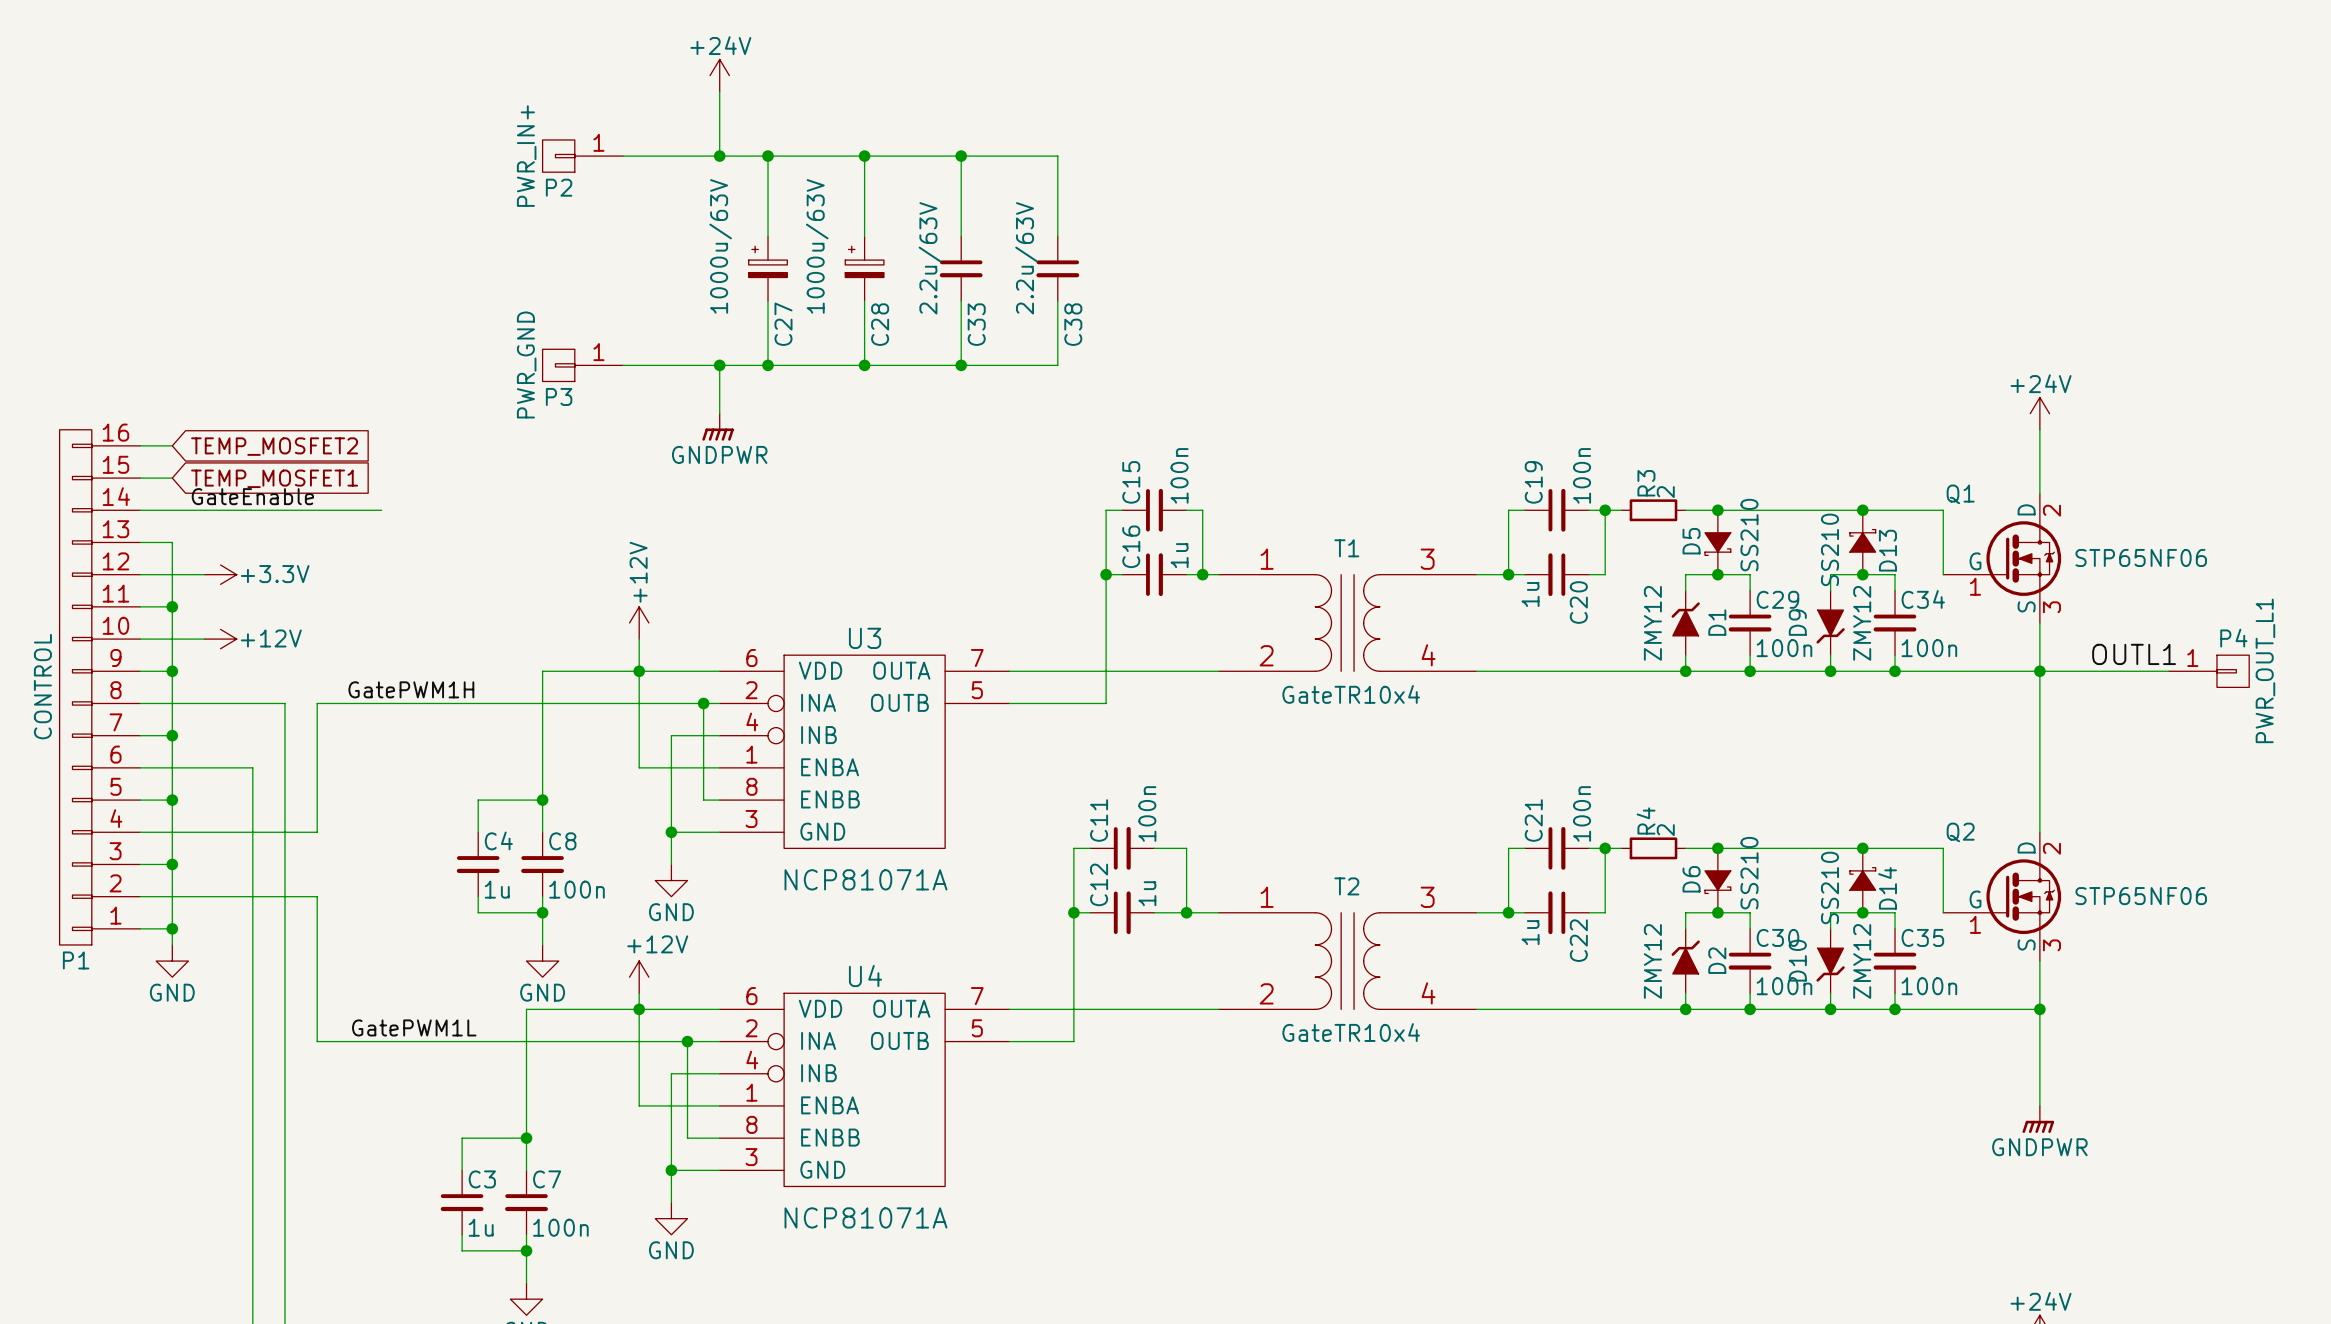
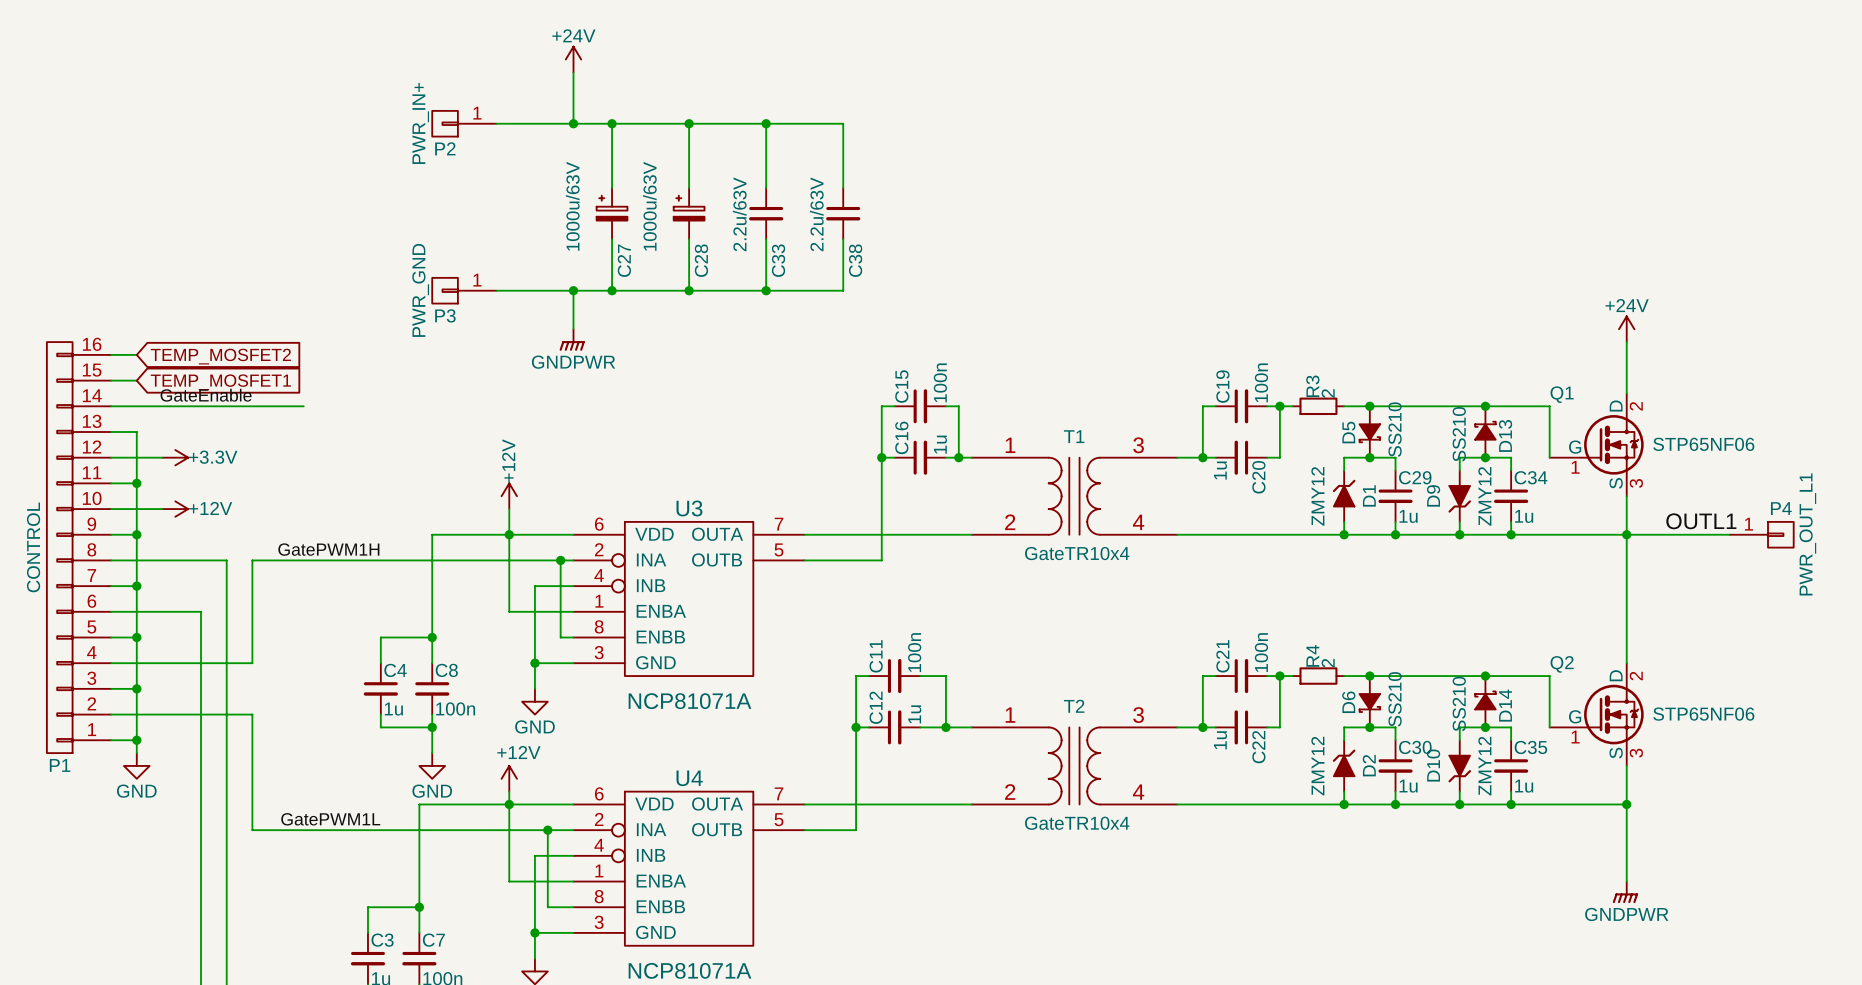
C29 value: 100n (1784, 648) -> 1u (1408, 516)
C34 value: 100n (1929, 648) -> 1u (1524, 516)
C30 value: 100n (1784, 986) -> 1u (1408, 786)
C35 value: 100n (1929, 986) -> 1u (1524, 786)

